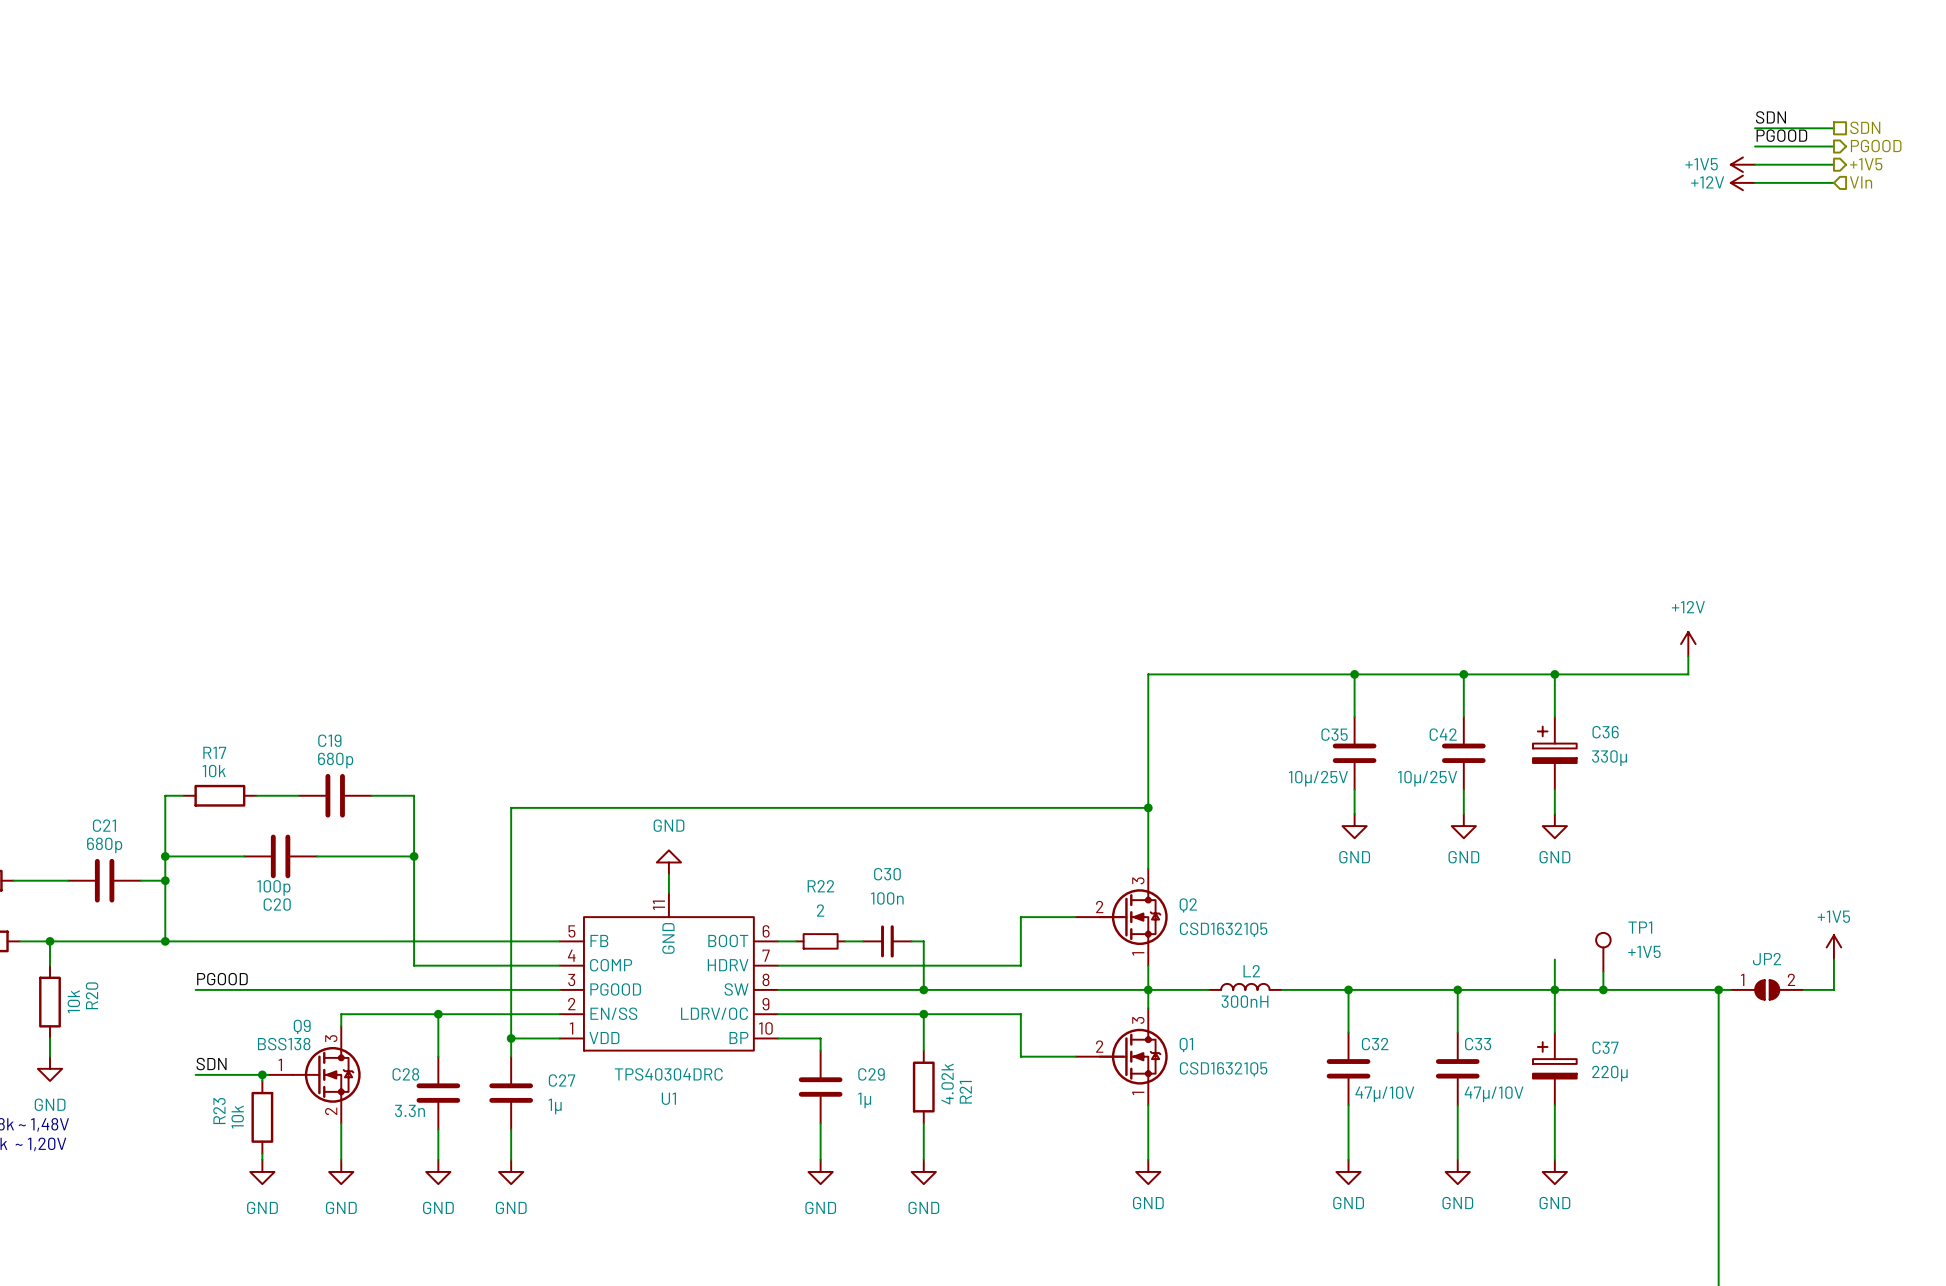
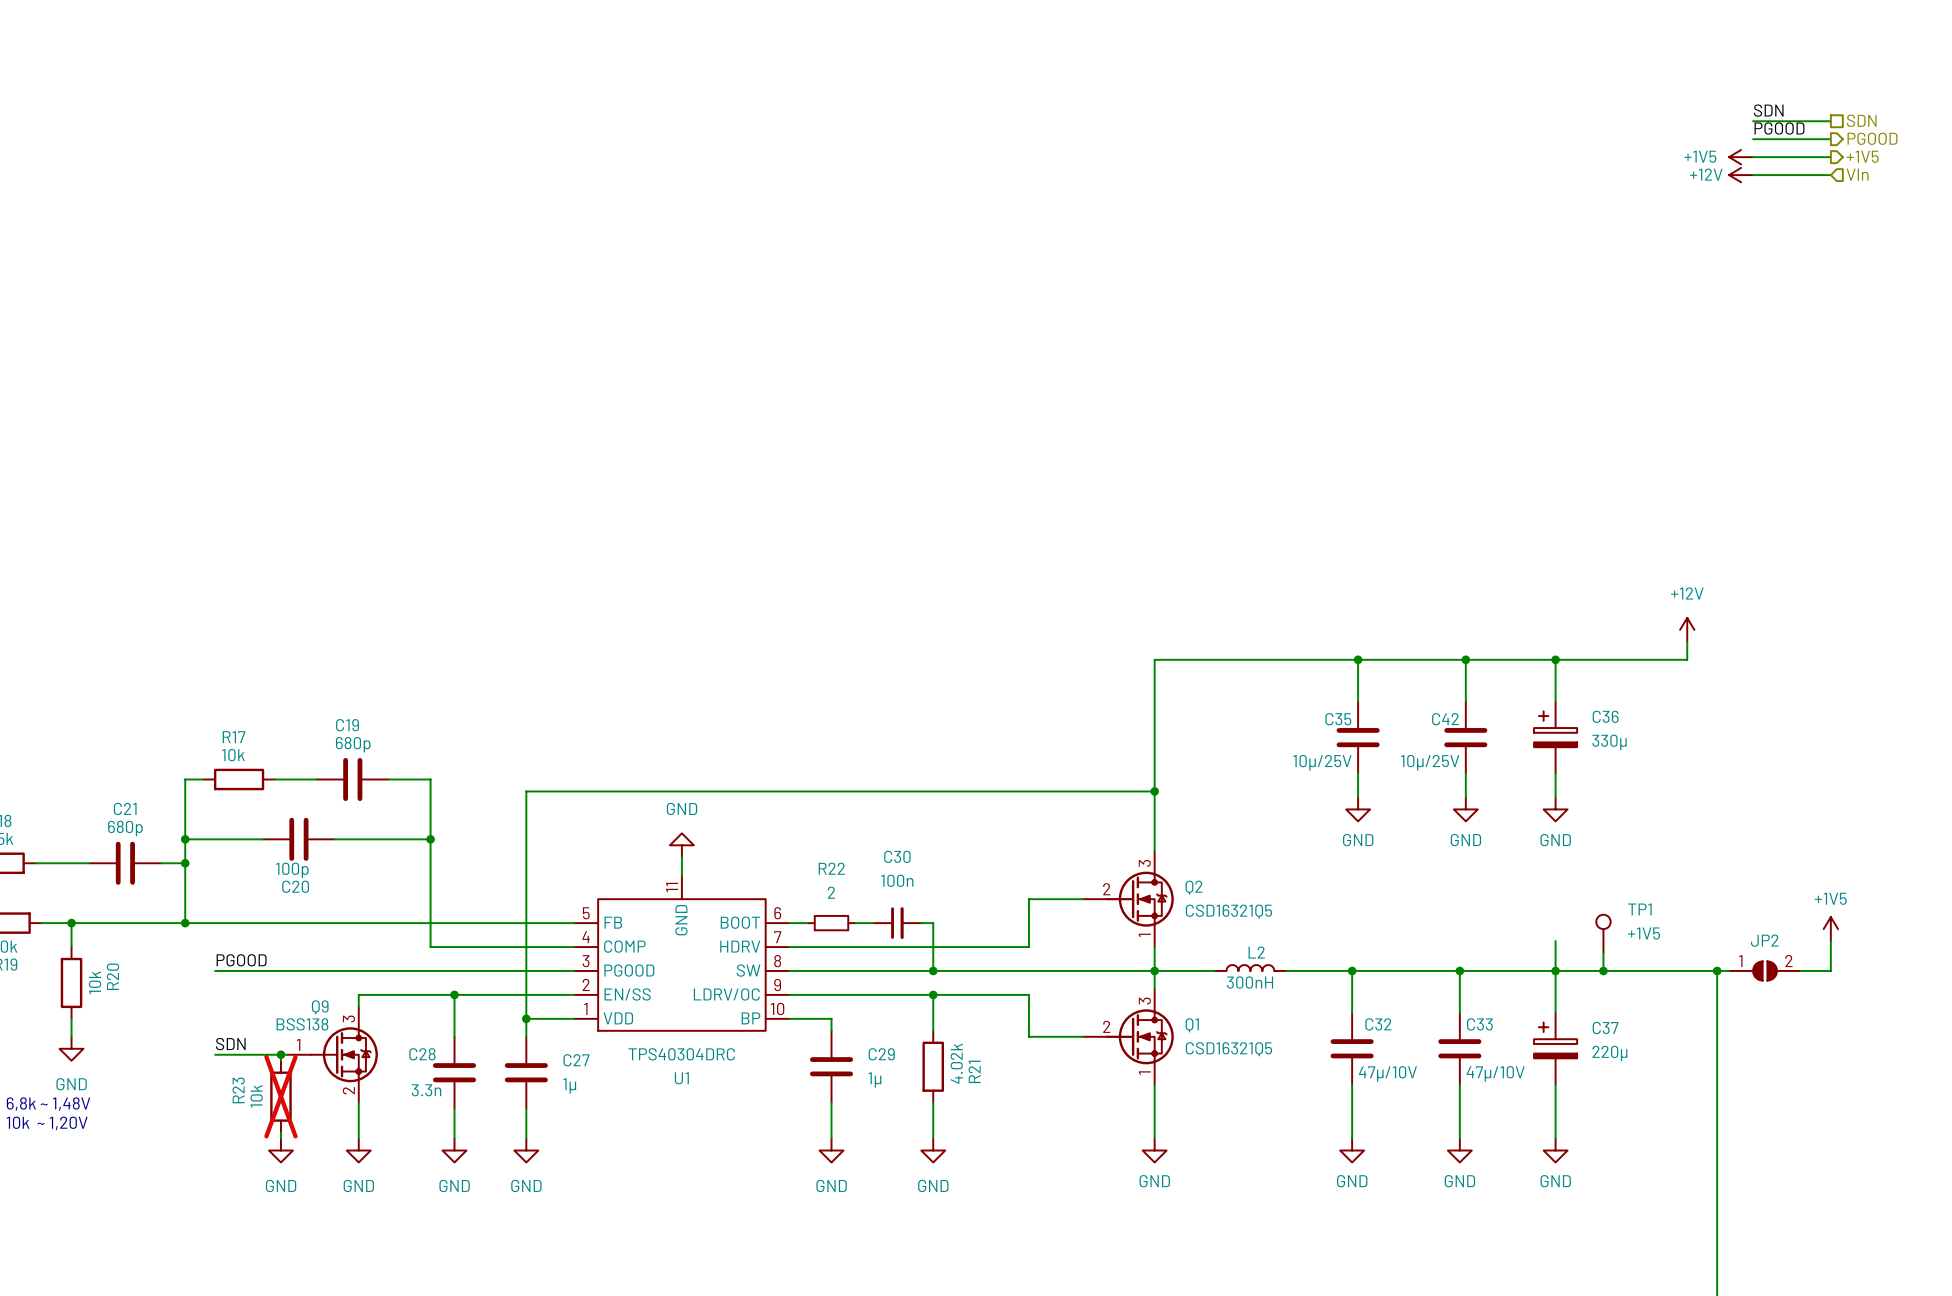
R23 do-not-place cross: none -> (280, 1096)

